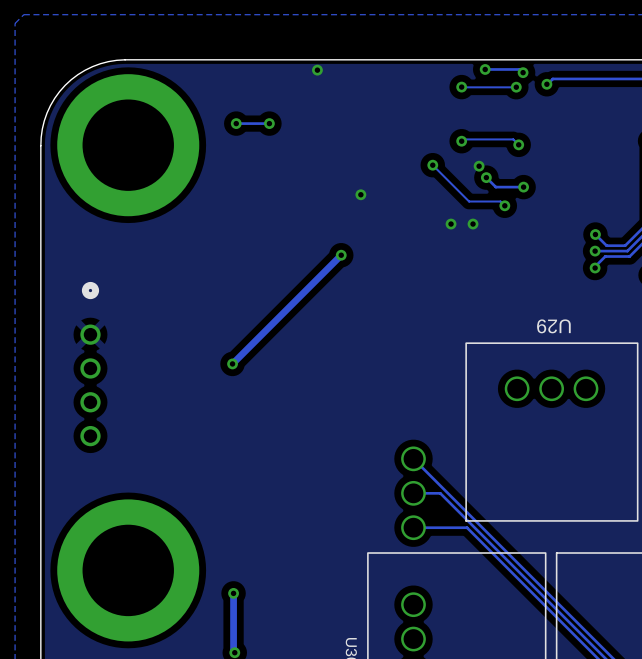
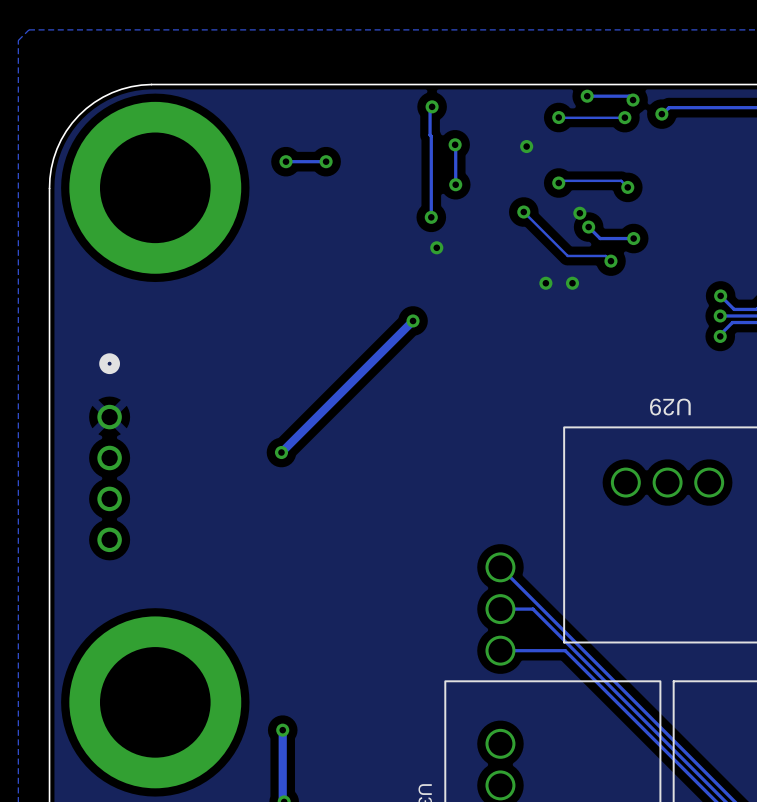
via: (317, 70) -> none
track: none -> (432, 106) (430, 108) (431, 217)
via: none -> (432, 106)
track: none -> (455, 144) (455, 184)
via: none -> (455, 144)
via: none -> (526, 146)
via: none -> (455, 184)
via: none -> (431, 217)

